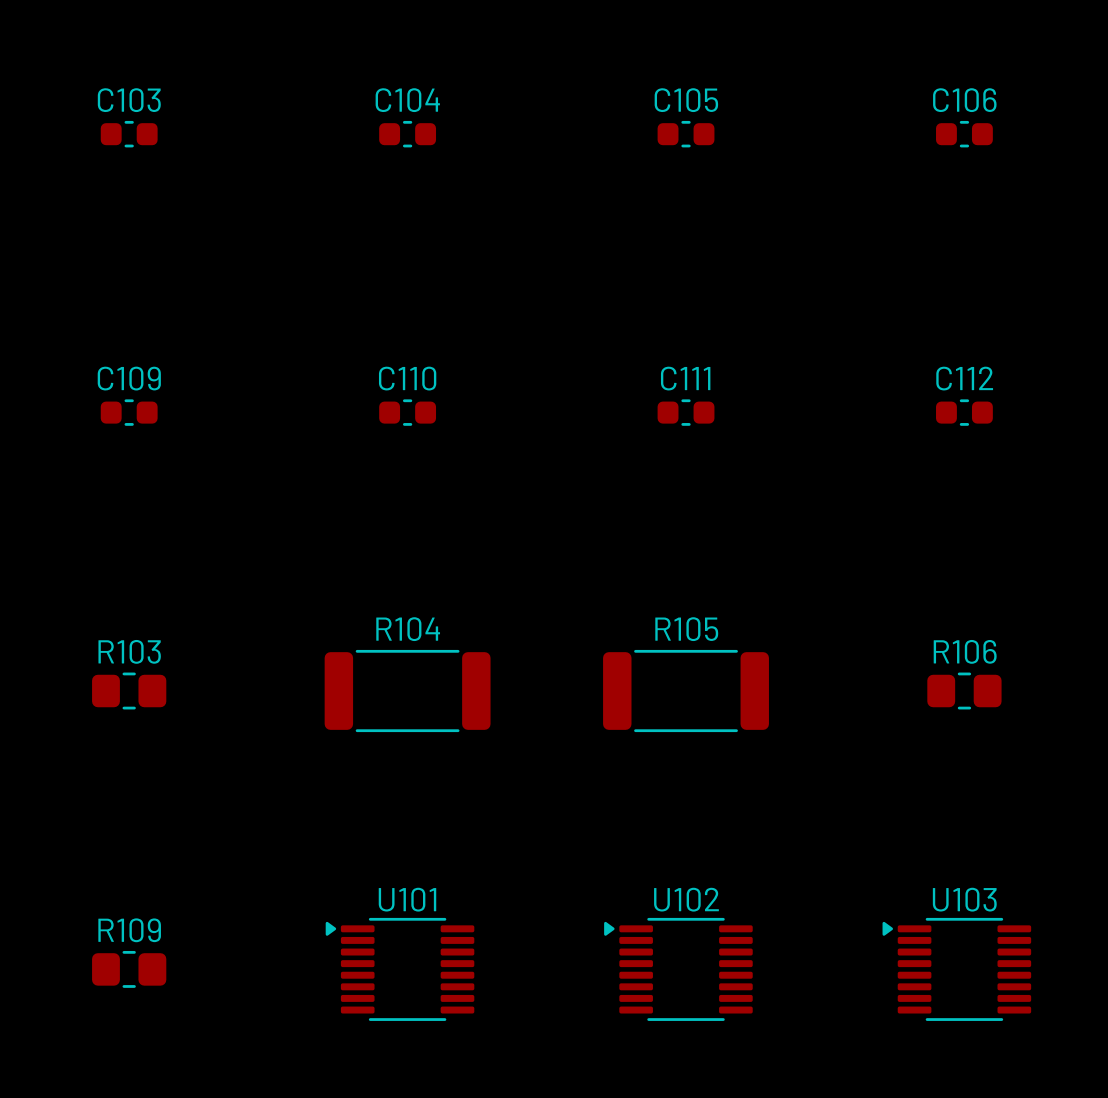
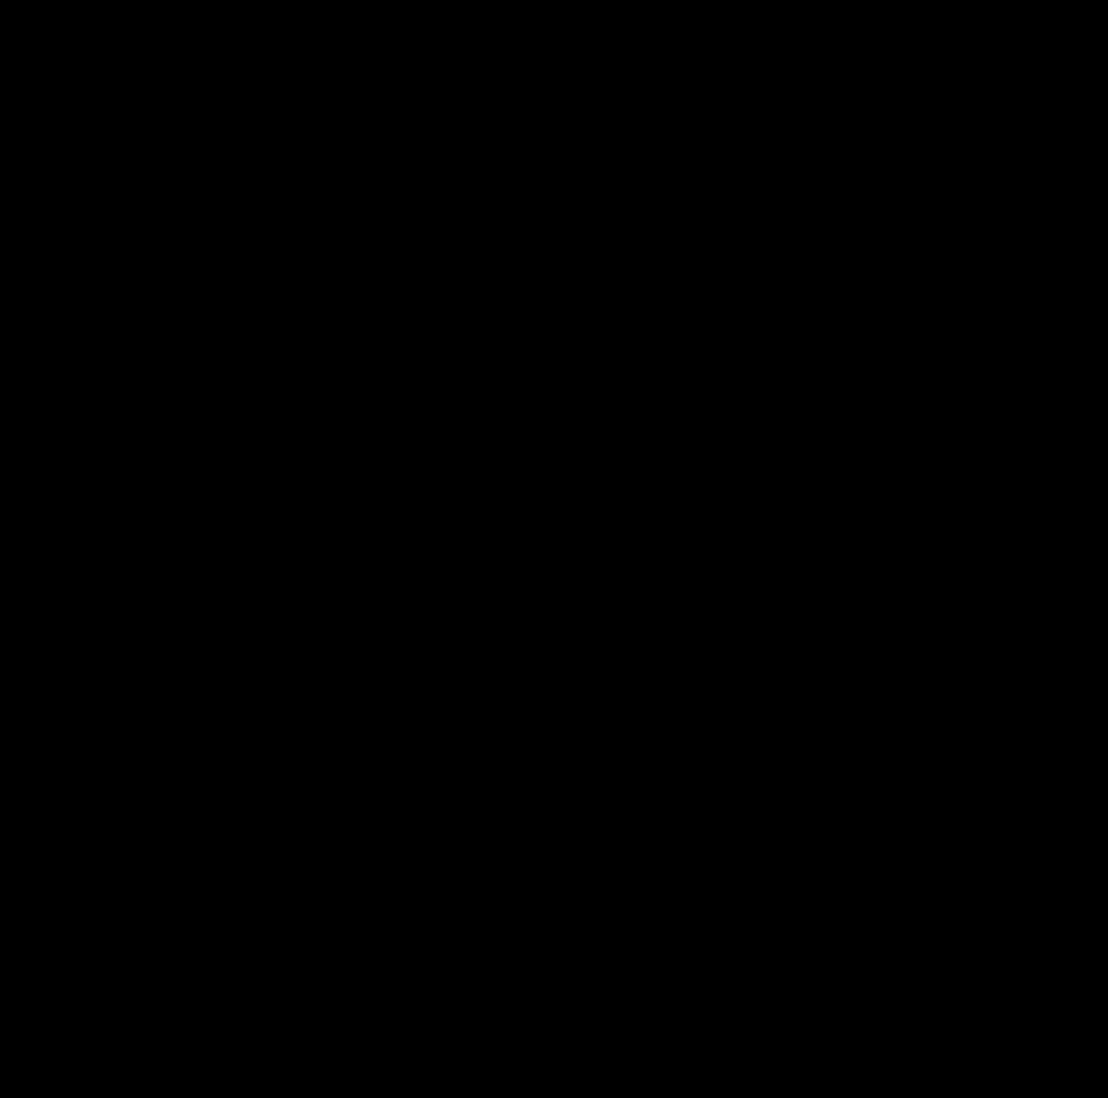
C103: (129, 134) -> none
C104: (407, 134) -> none
C105: (686, 134) -> none
C106: (964, 134) -> none
C109: (129, 412) -> none
C110: (407, 412) -> none
C111: (686, 412) -> none
C112: (964, 412) -> none
R103: (129, 691) -> none
R104: (407, 691) -> none
R105: (686, 691) -> none
R106: (964, 691) -> none
R109: (129, 969) -> none
U101: (400, 969) -> none
U102: (678, 969) -> none
U103: (956, 969) -> none

